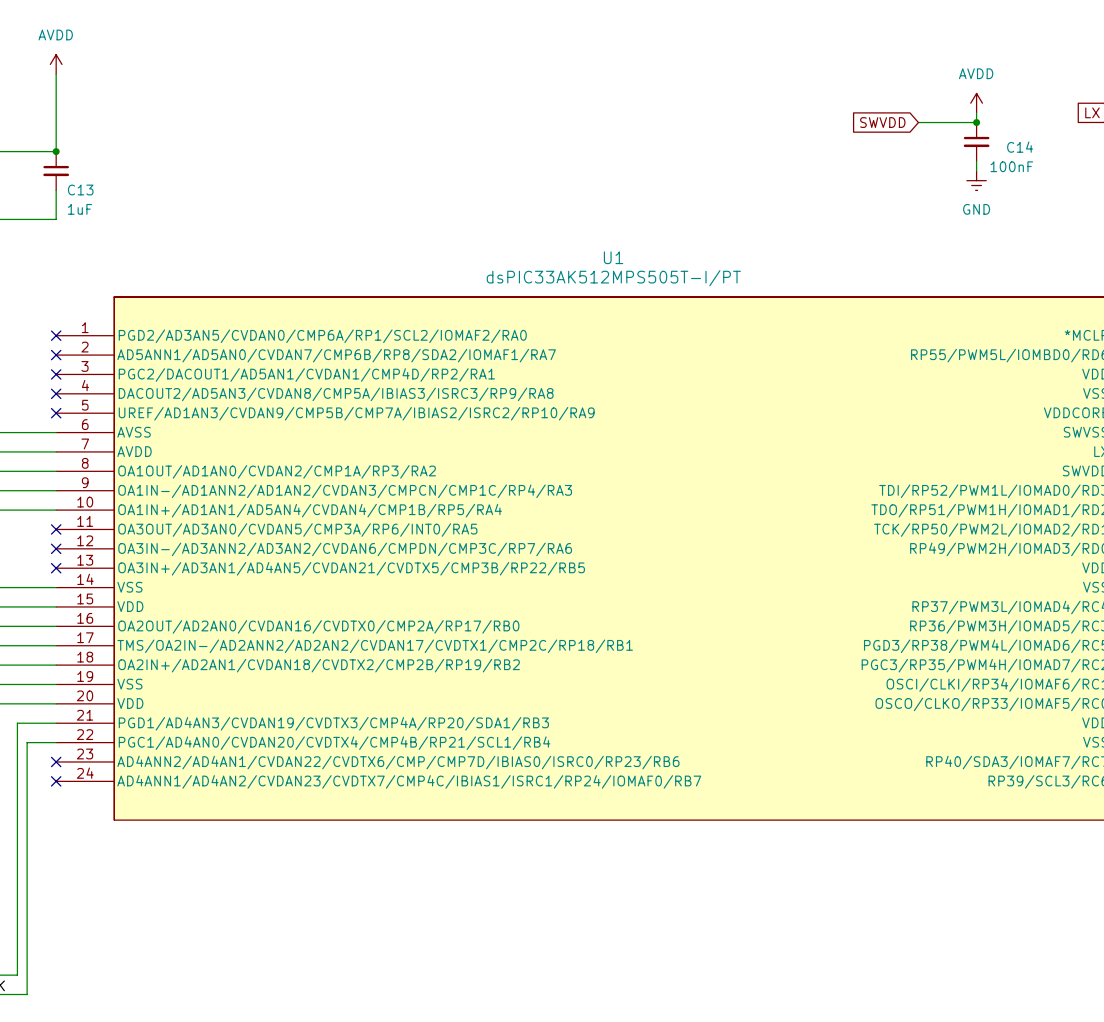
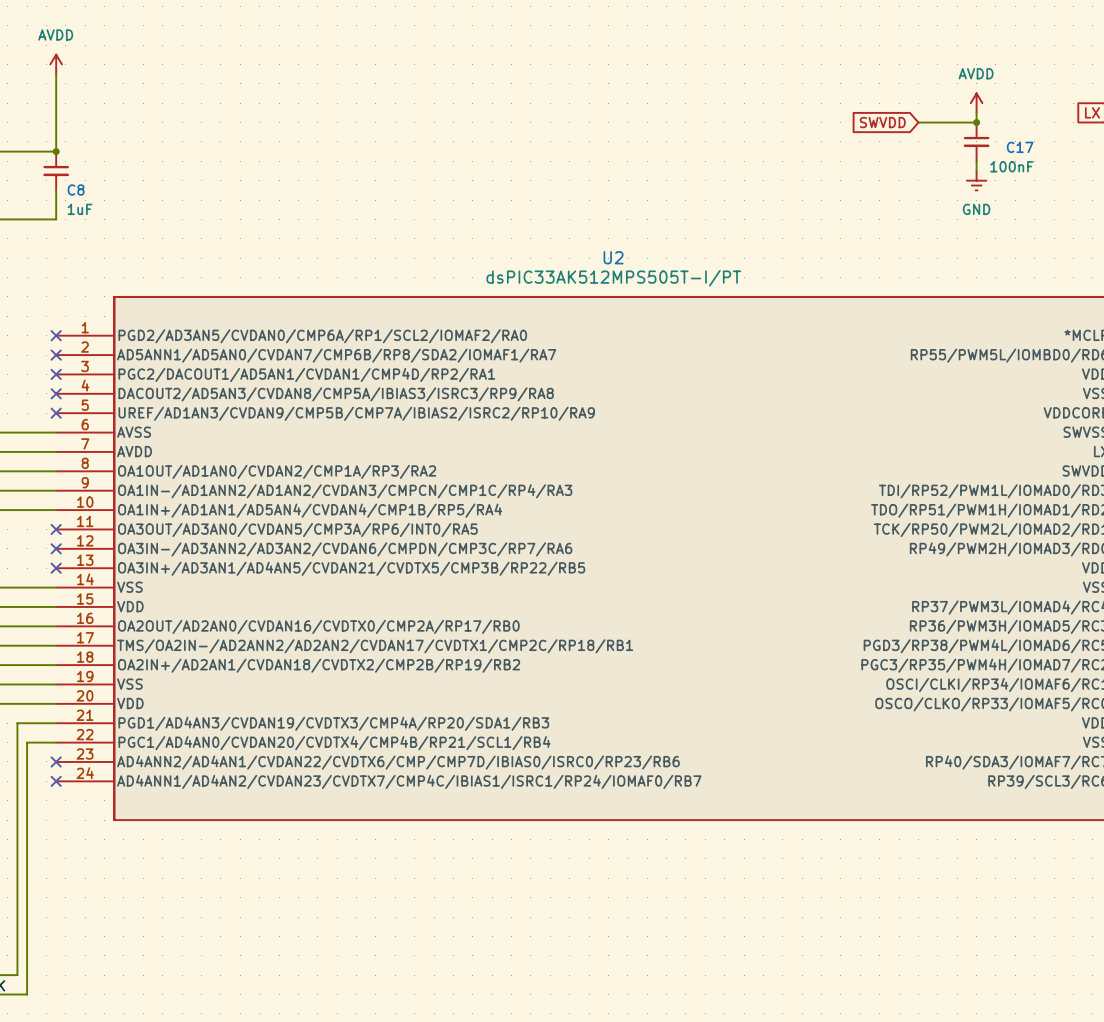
C14 name: C14 (1020, 147) -> C17 (1020, 147)
C13 name: C13 (80, 190) -> C8 (76, 190)
U1 name: U1 (613, 257) -> U2 (613, 257)

